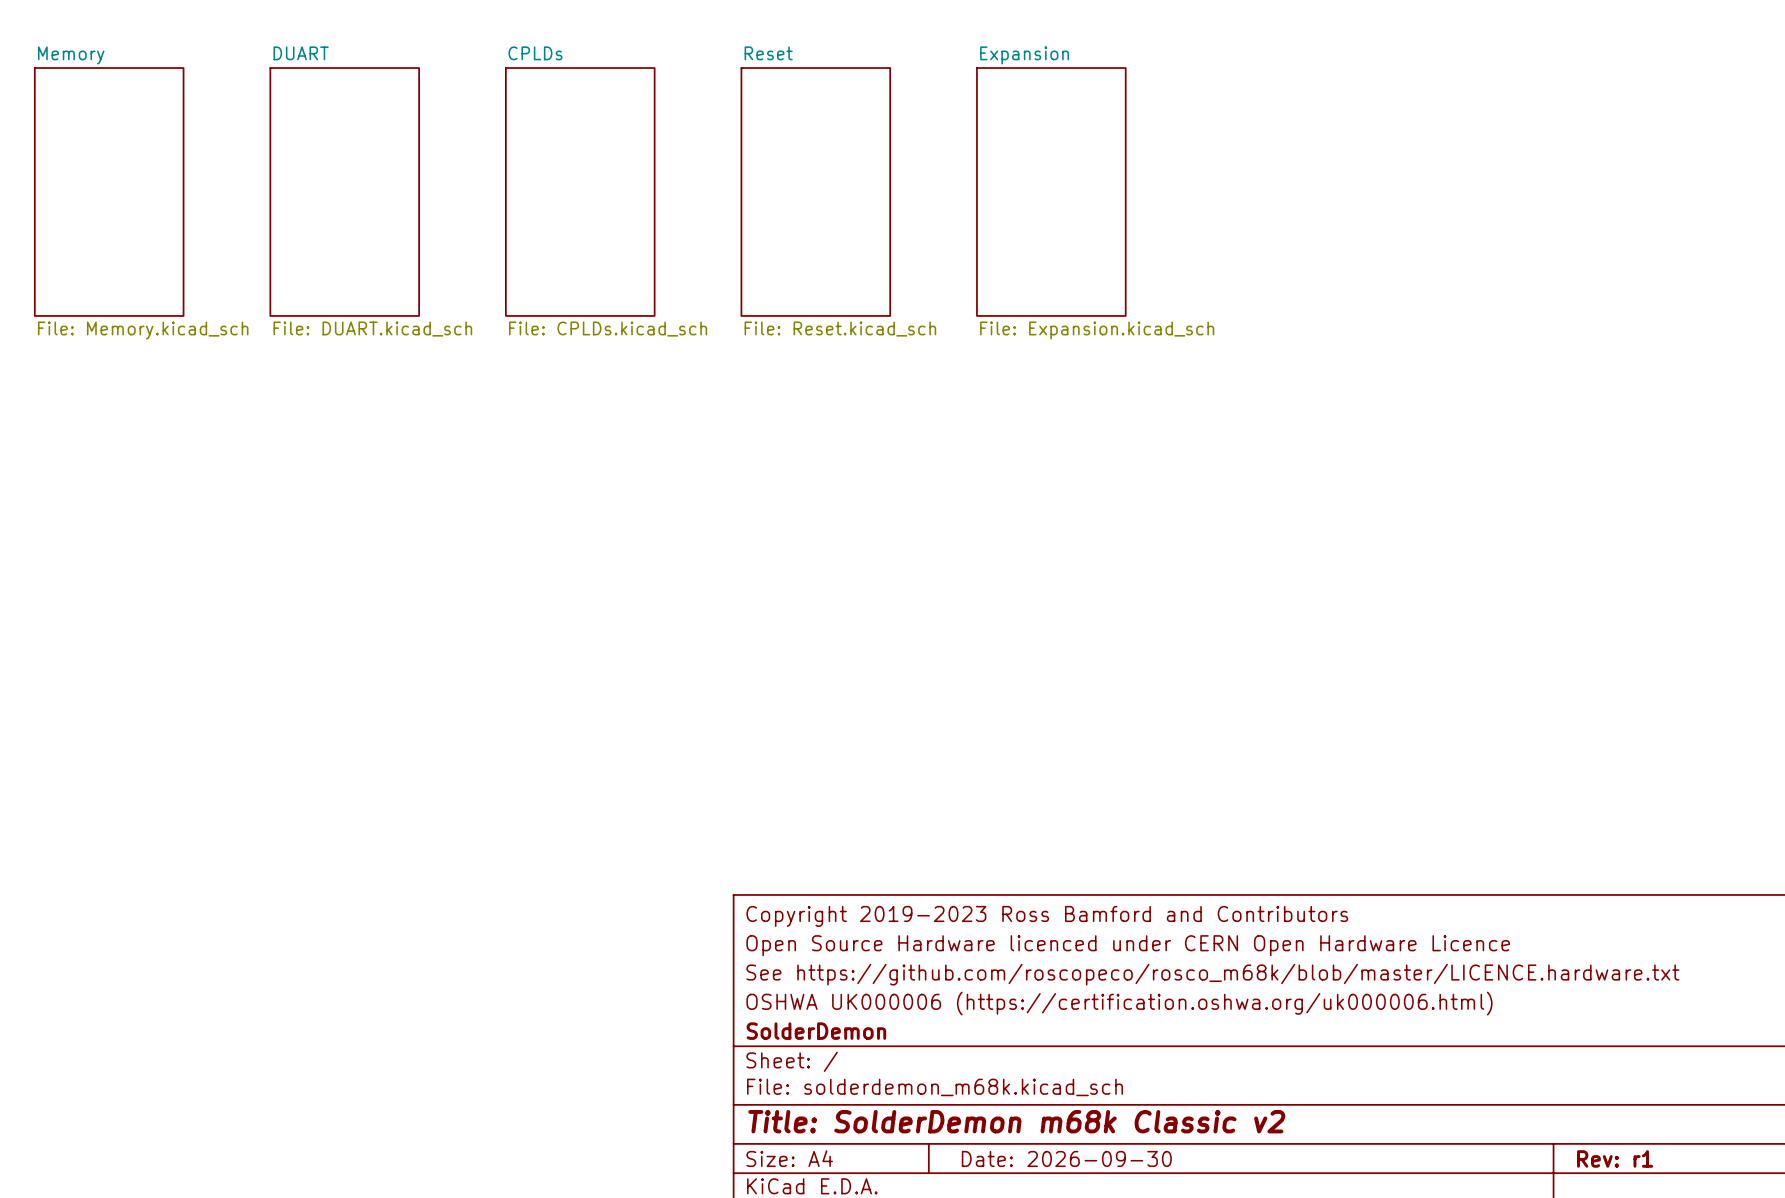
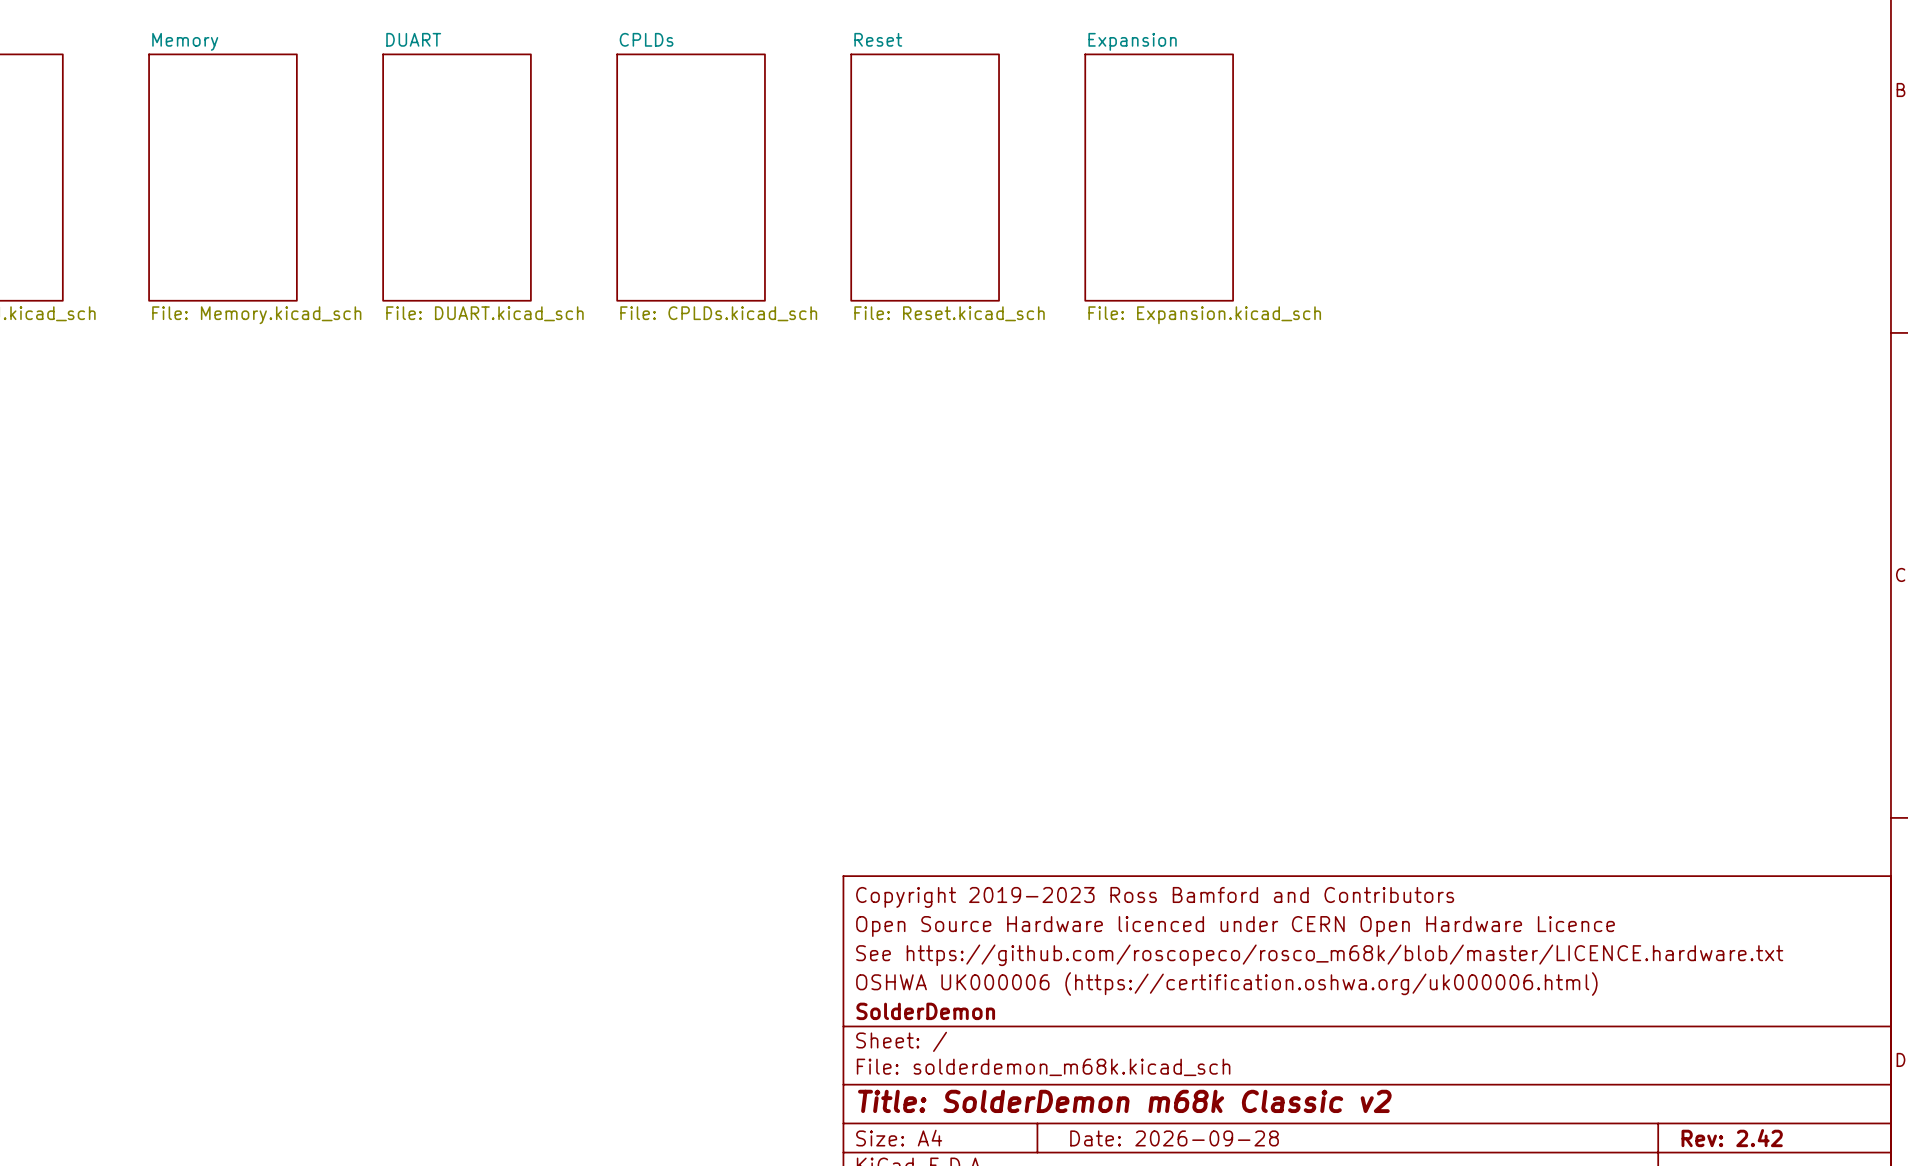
title block: Date: 2026-09-30 (1066, 1158) -> Date: 2026-09-28 (1174, 1138)
title block: Rev: r1 (1615, 1158) -> Rev: 2.42 (1732, 1138)

